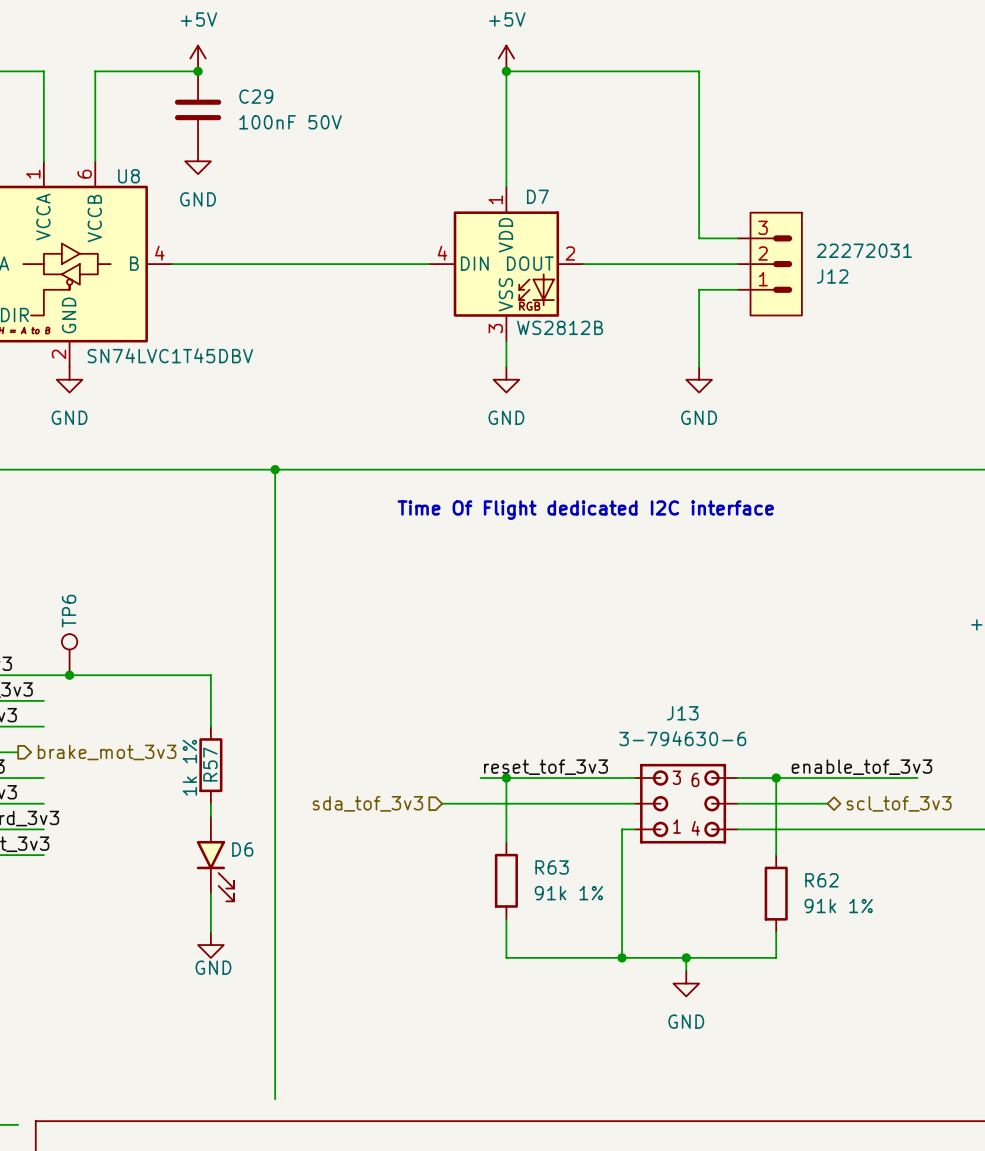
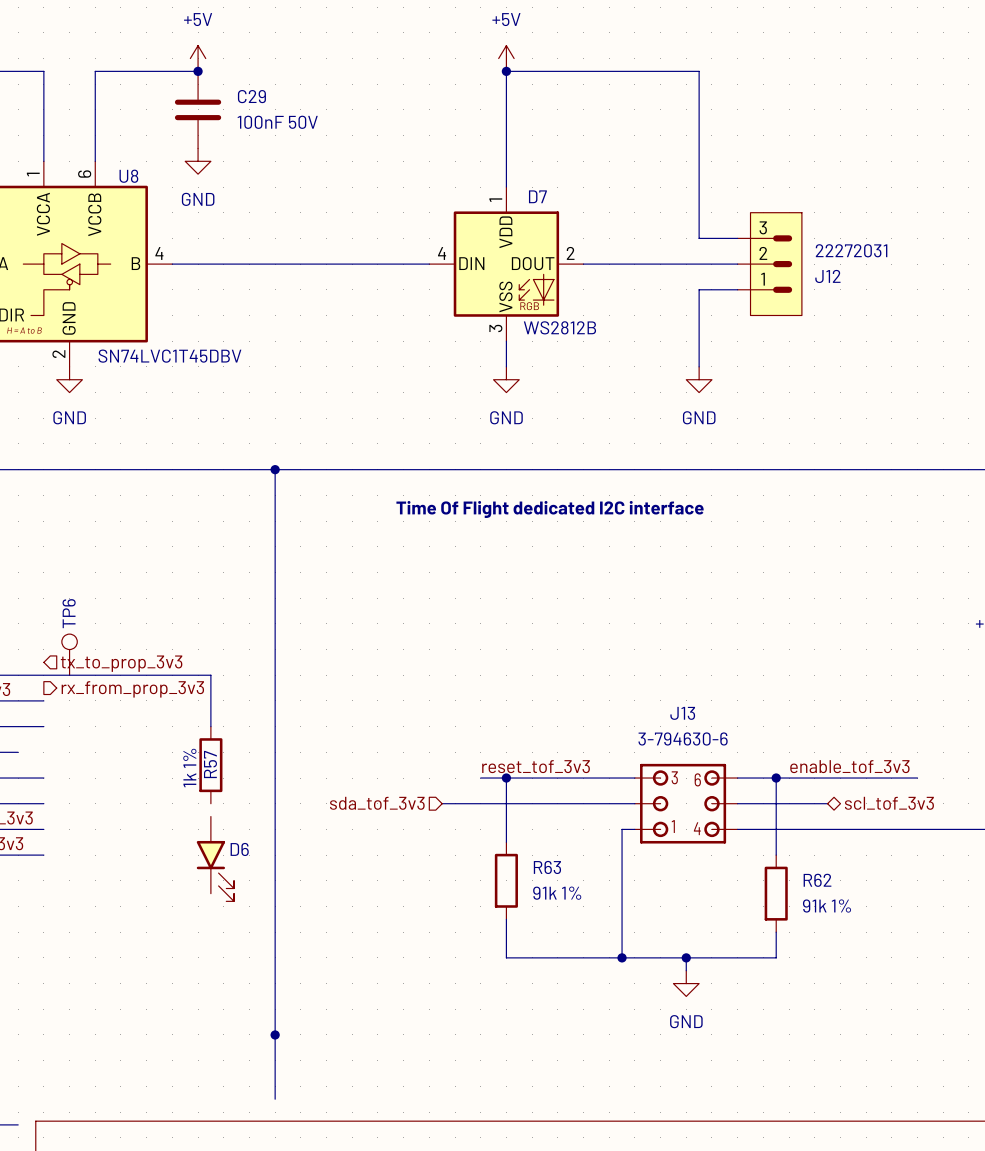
hierarchical label: none -> tx_to_prop_3v3 (121, 663)
junction: (69, 675) -> none
hierarchical label: none -> rx_from_prop_3v3 (132, 689)
hierarchical label: brake_mot_3v3 (107, 752) -> none
wire: (210, 803) (210, 816) -> none
wire: (210, 893) (210, 932) -> none
power symbol: GND (210, 945) -> none
junction: none -> (275, 1034)

